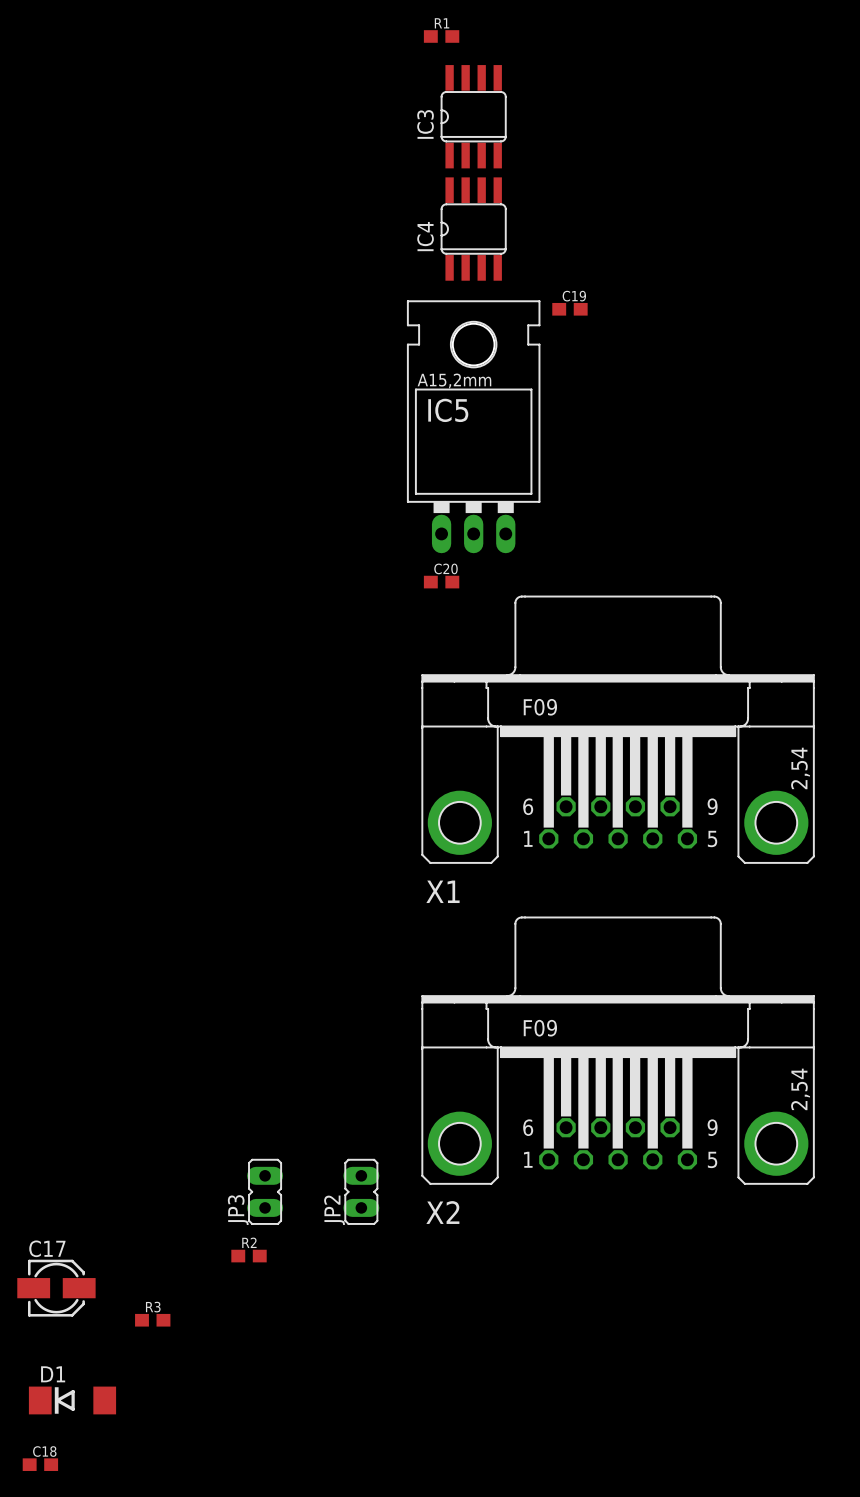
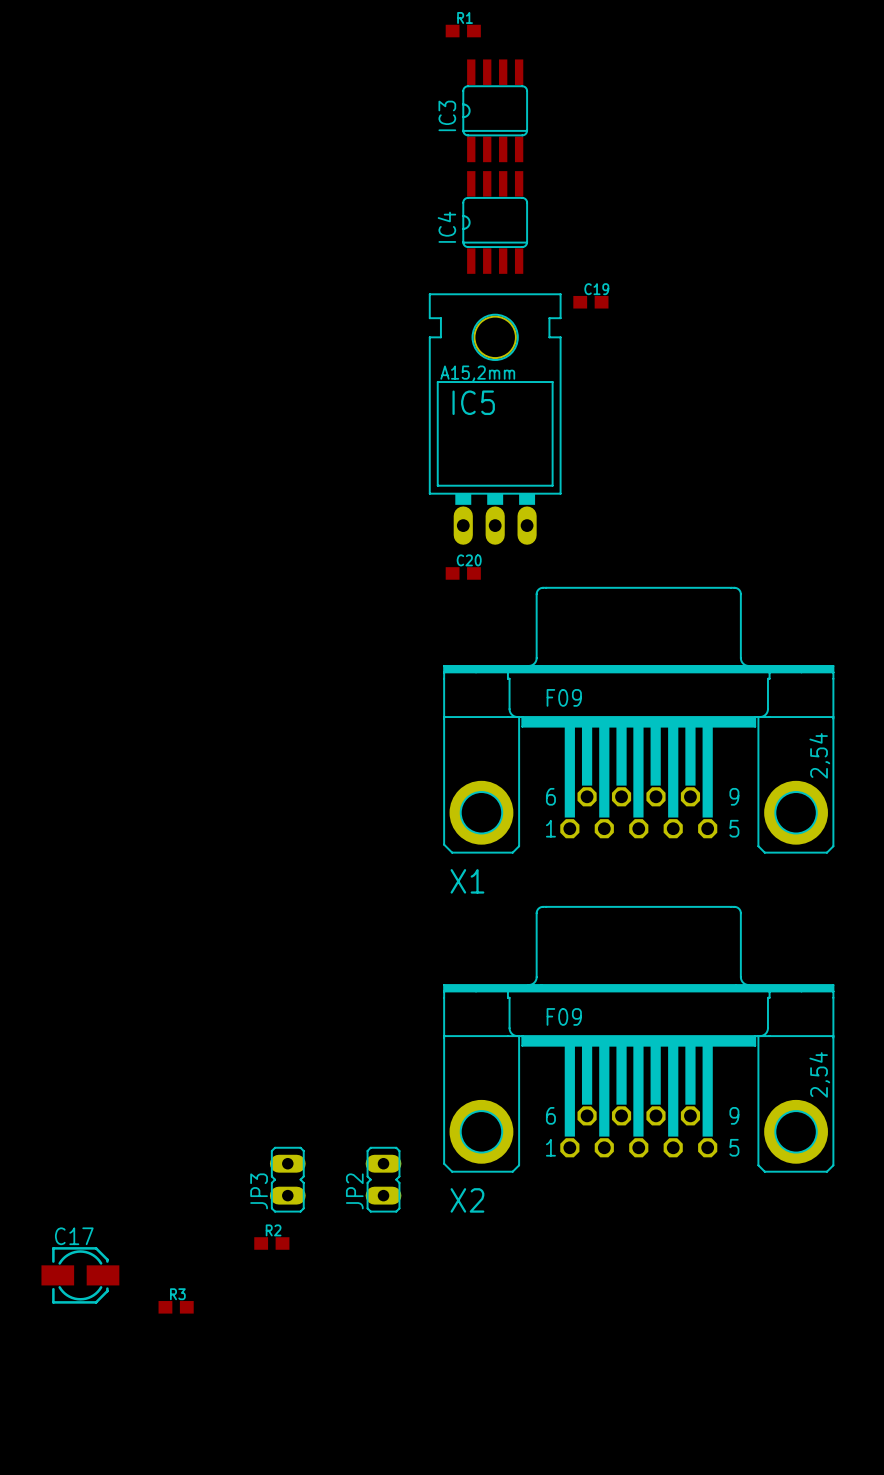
D1: (72, 1400) -> none
C18: (40, 1464) -> none

